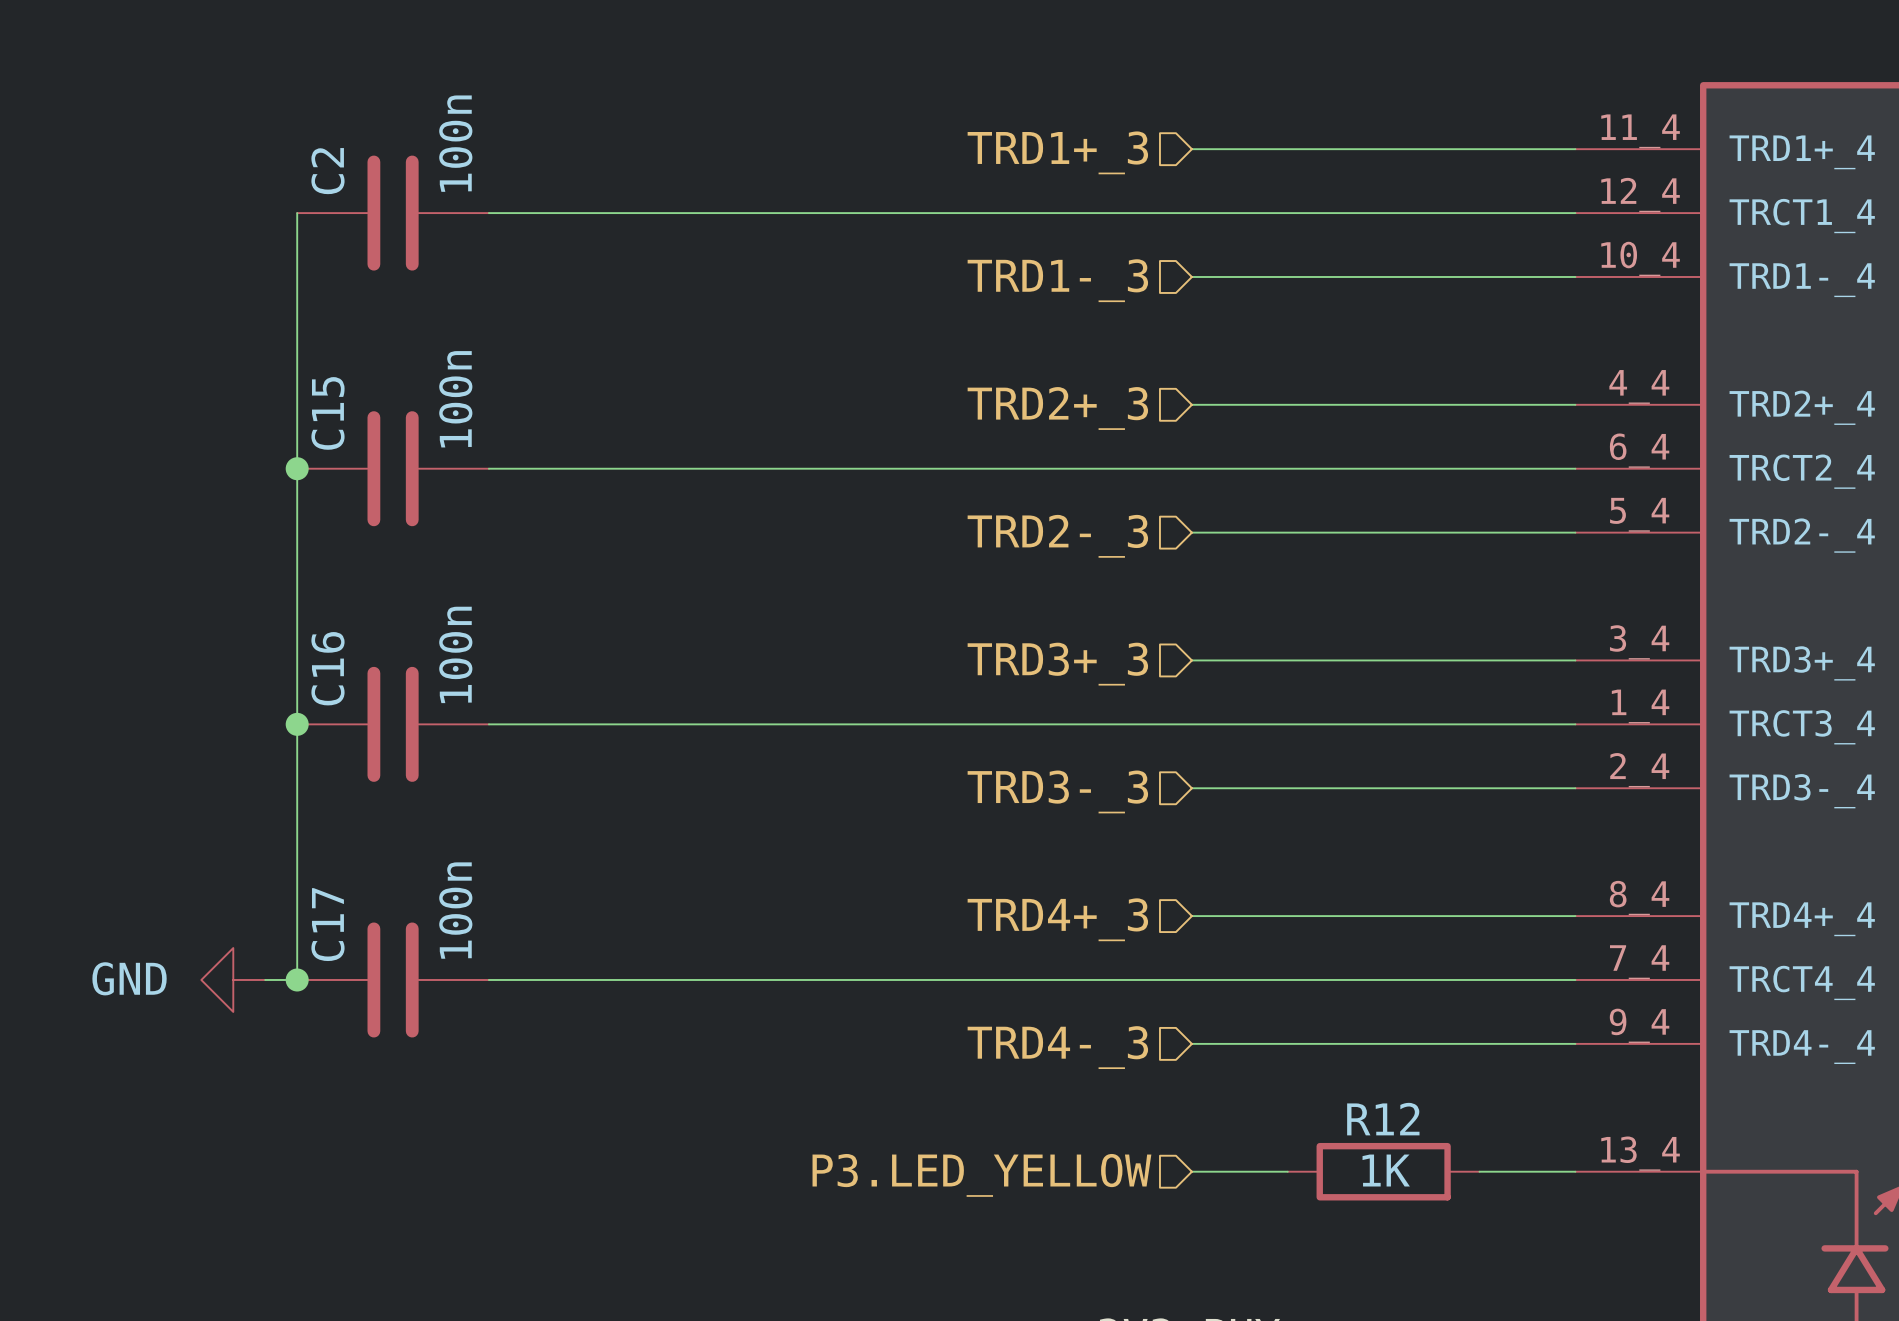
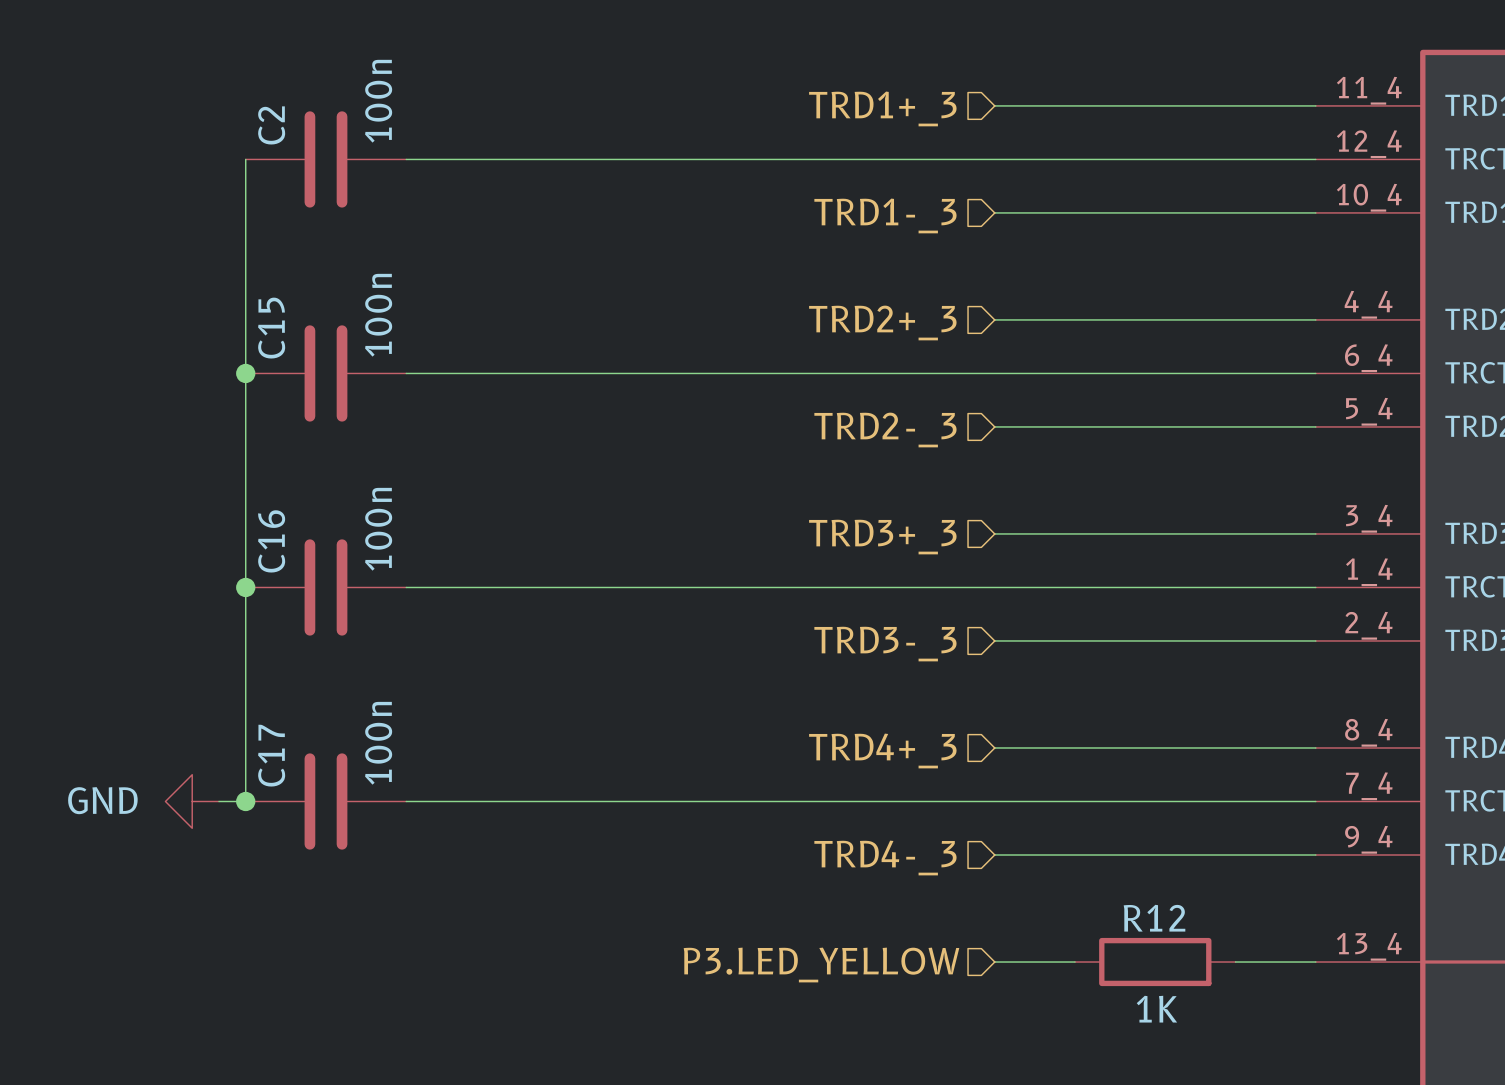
R12 value position: 1K (1386, 1170) -> 1K (1156, 1009)

